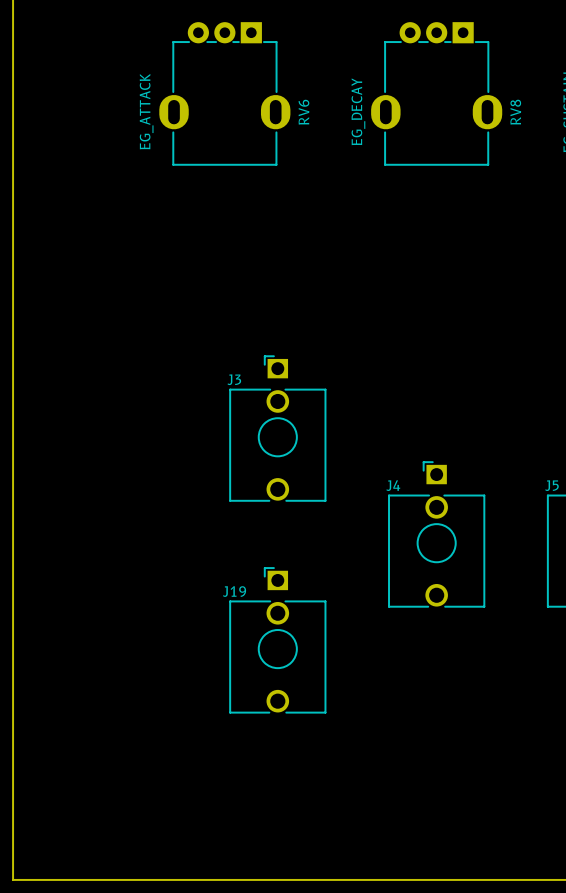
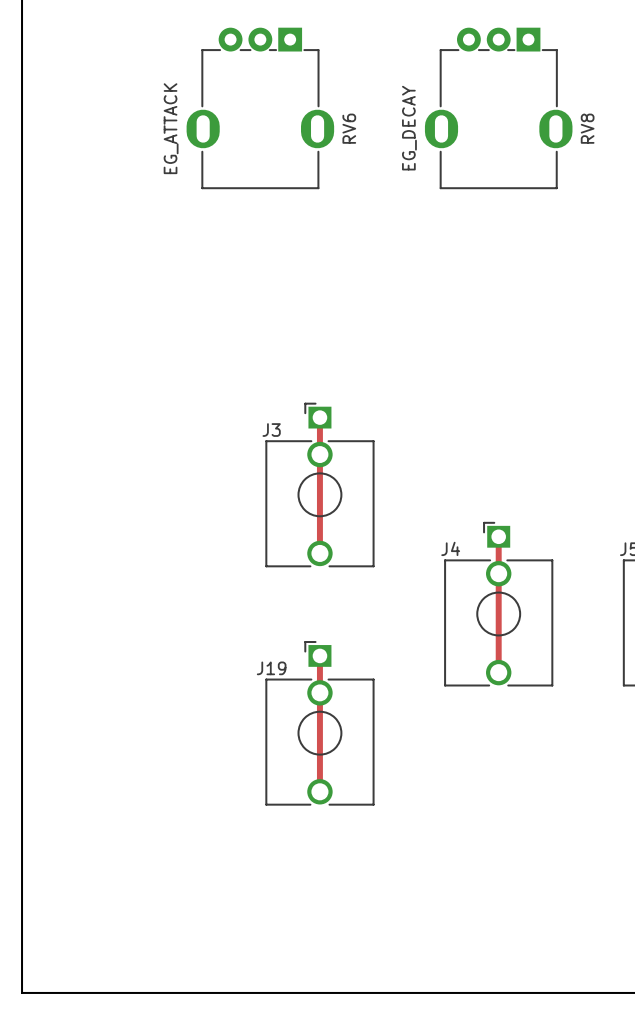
track: none -> (319, 417) (319, 553)
track: none -> (498, 536) (498, 672)
track: none -> (319, 655) (319, 791)

